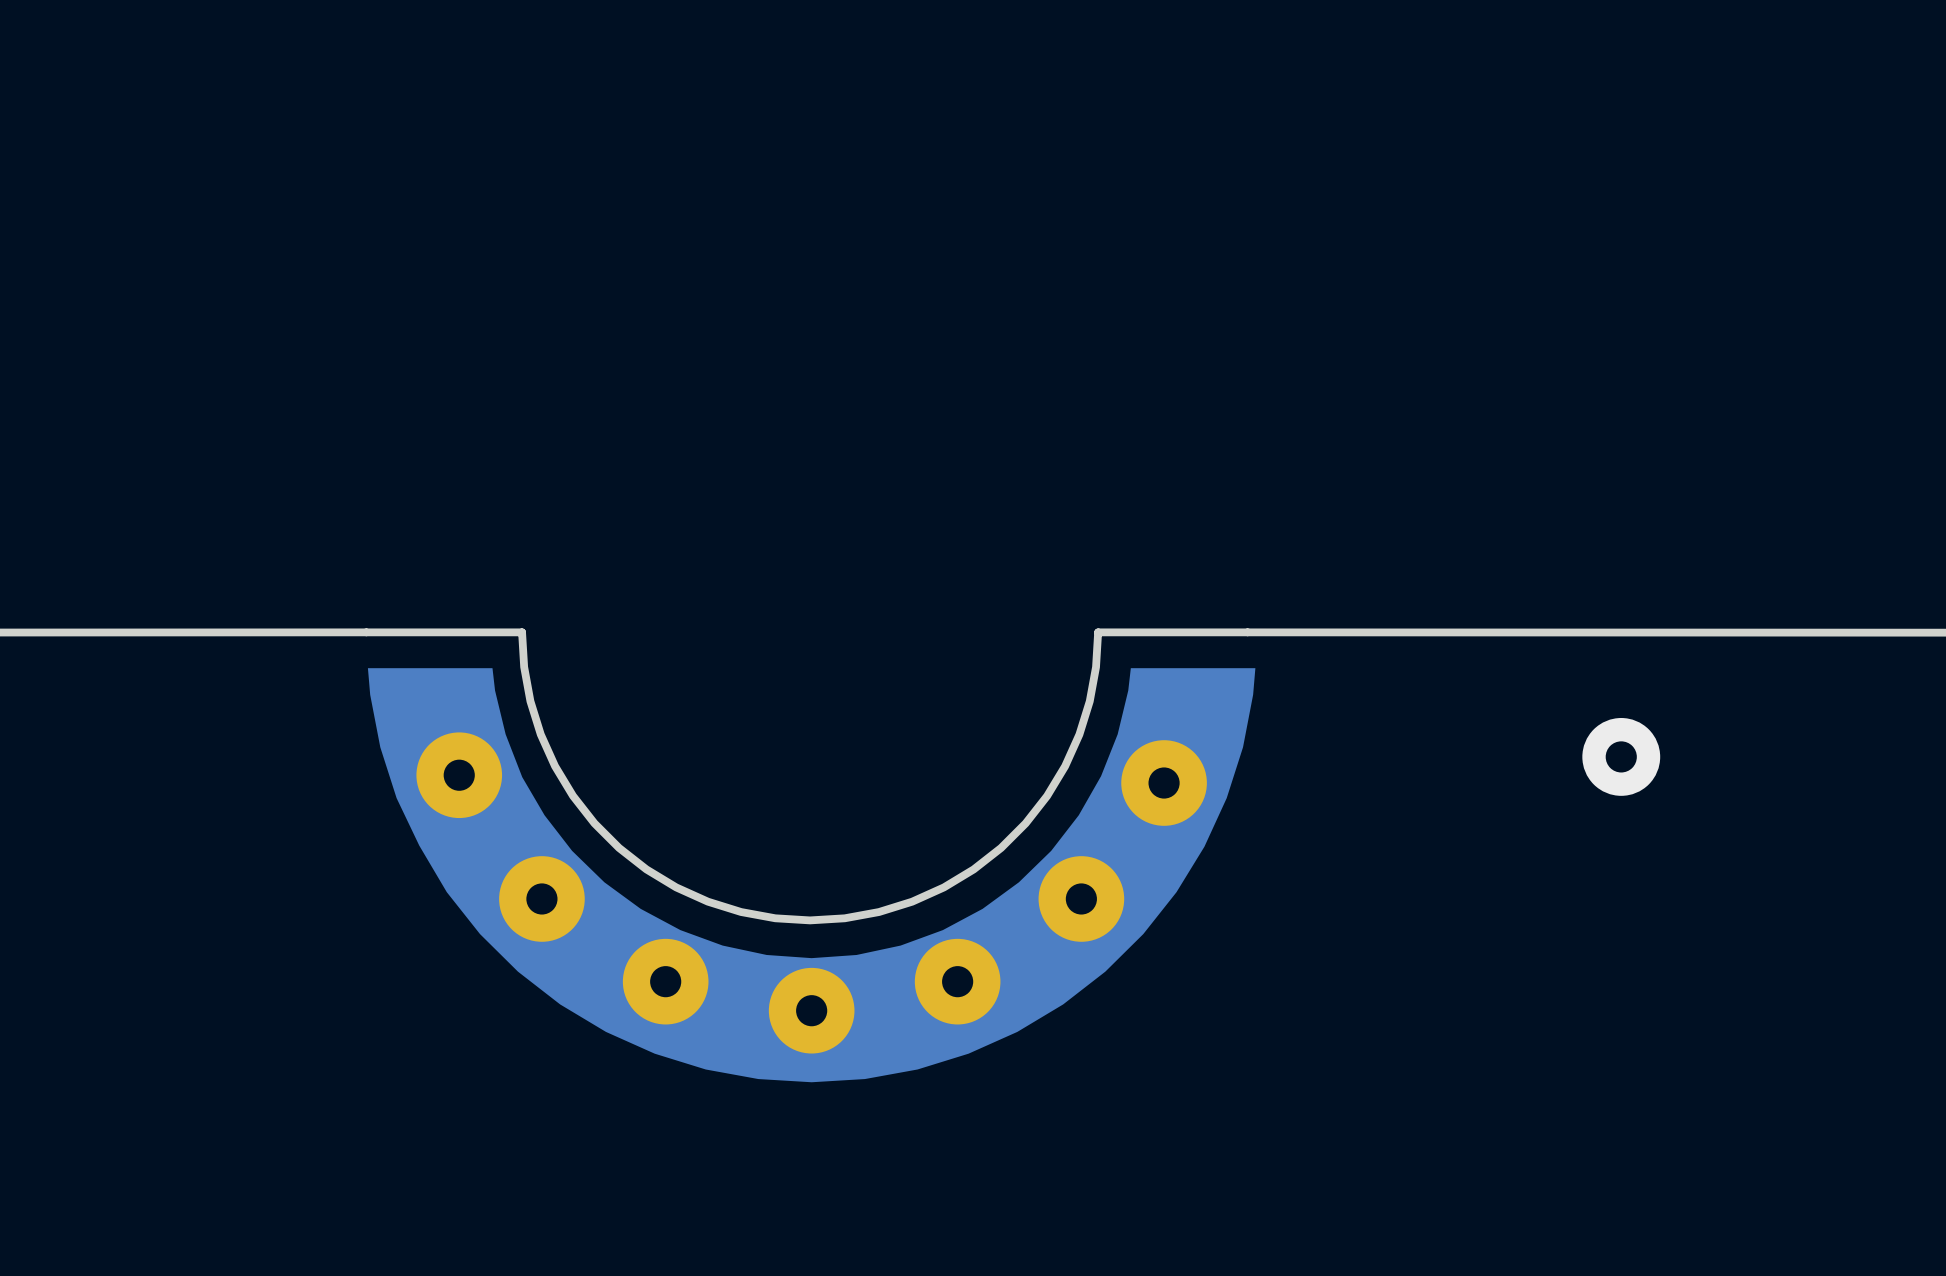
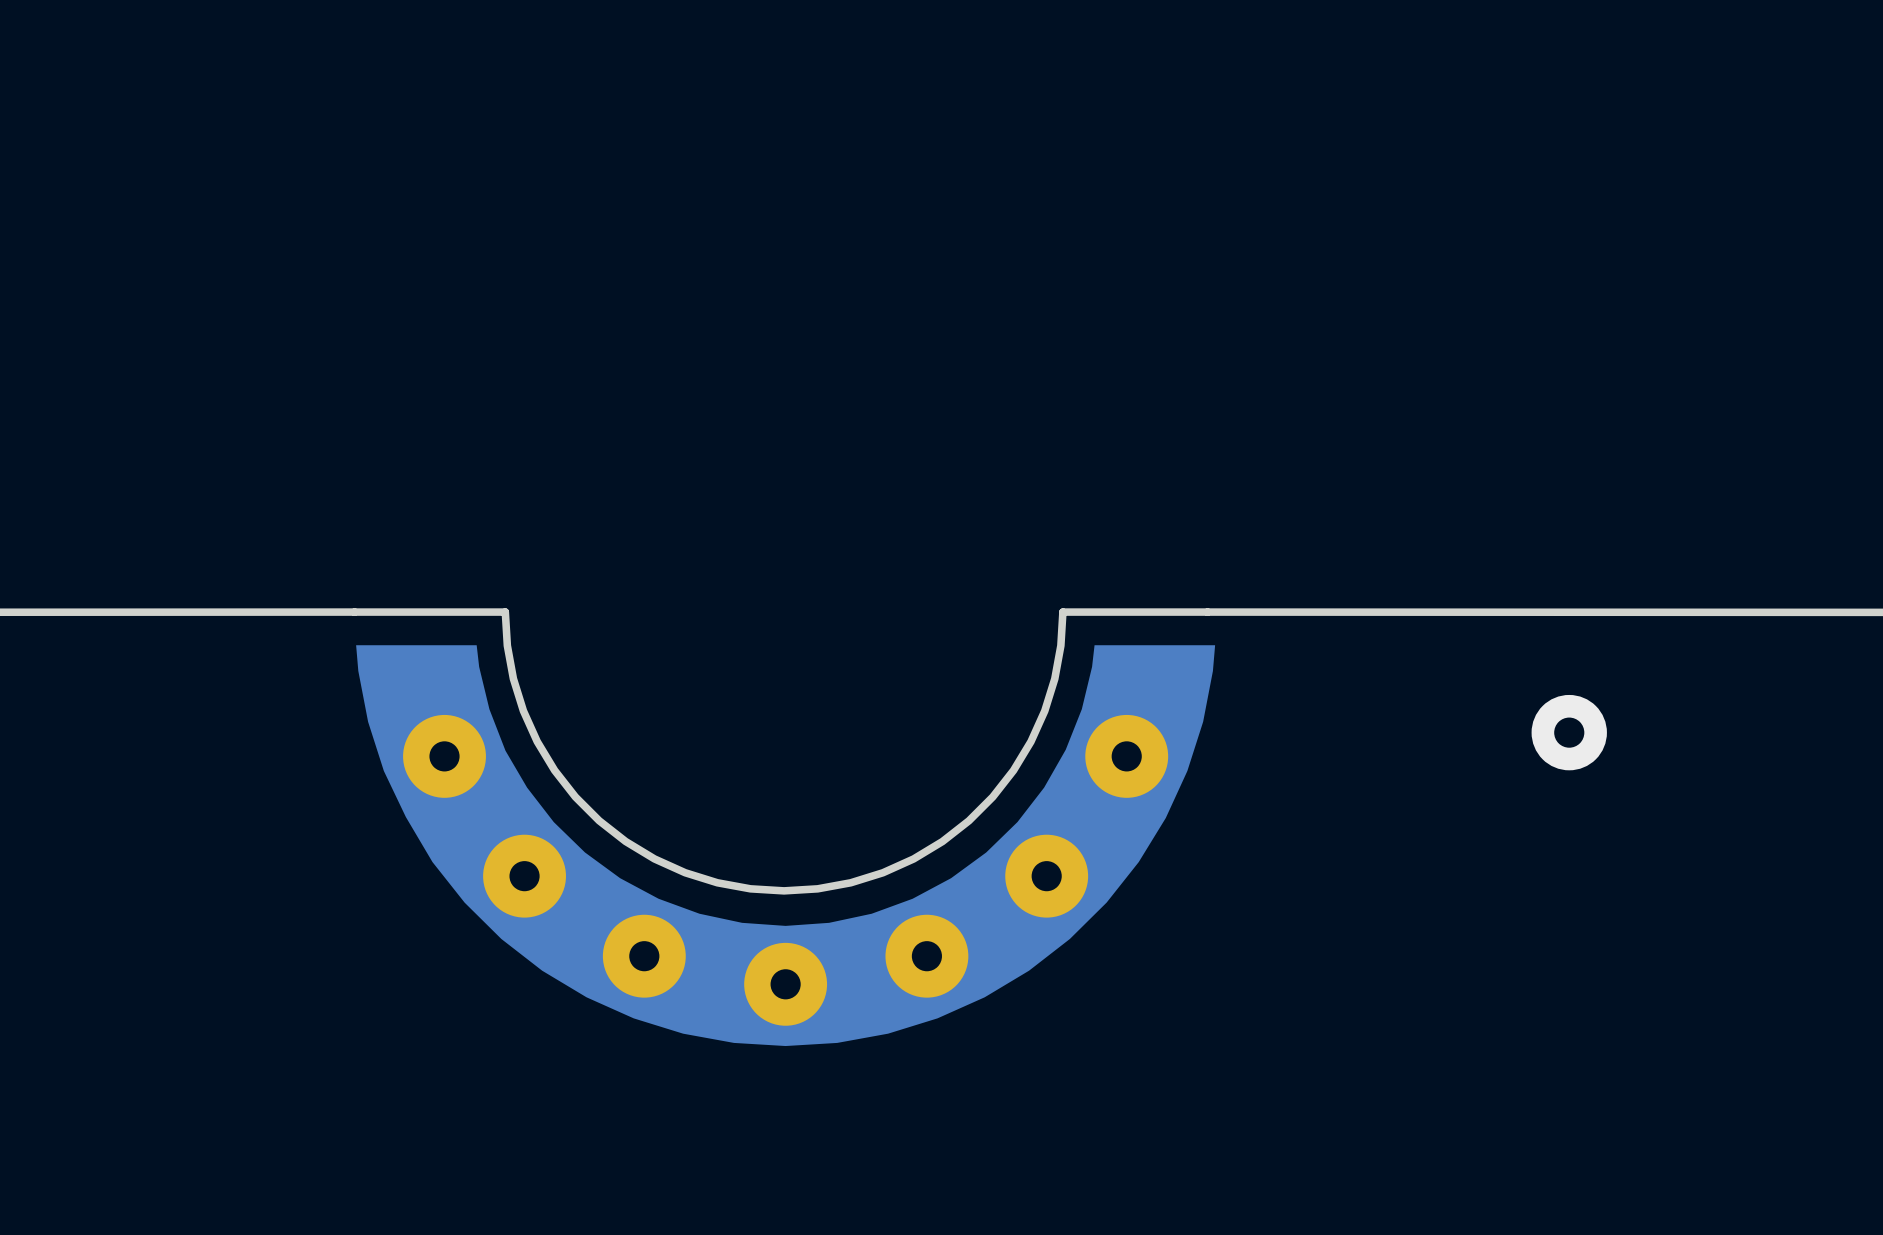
part footprint: [367, 668, 1256, 1083] -> [356, 645, 1216, 1047]

